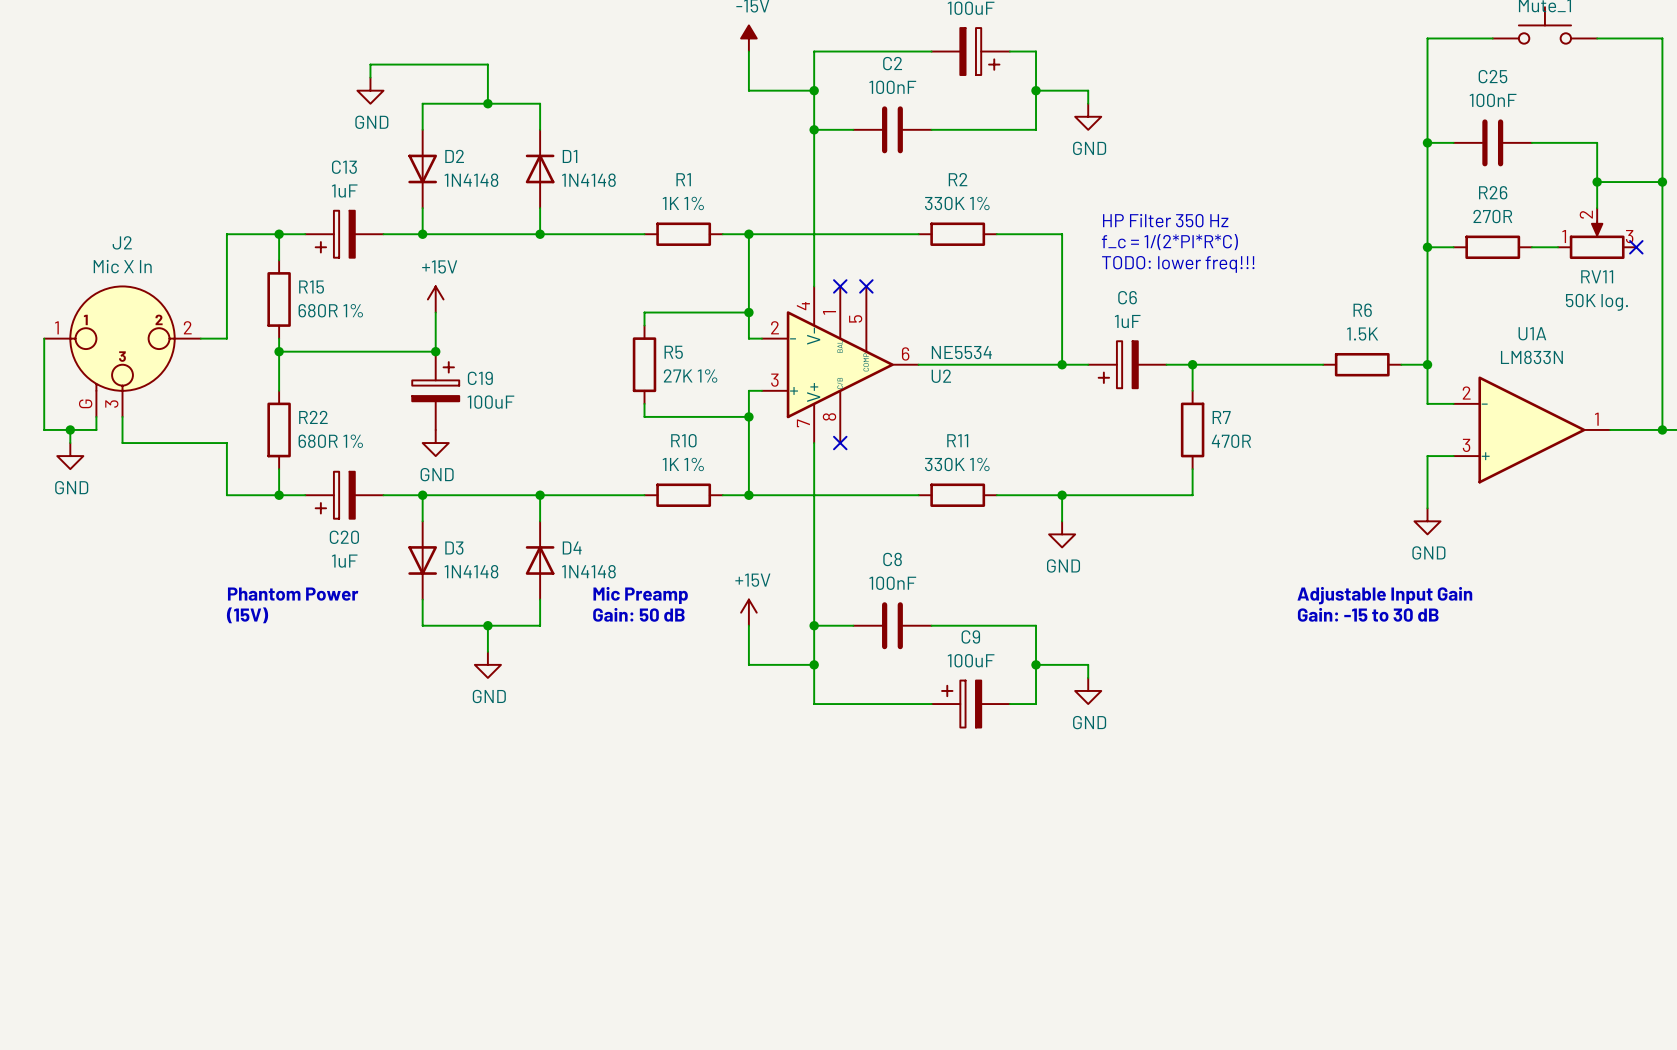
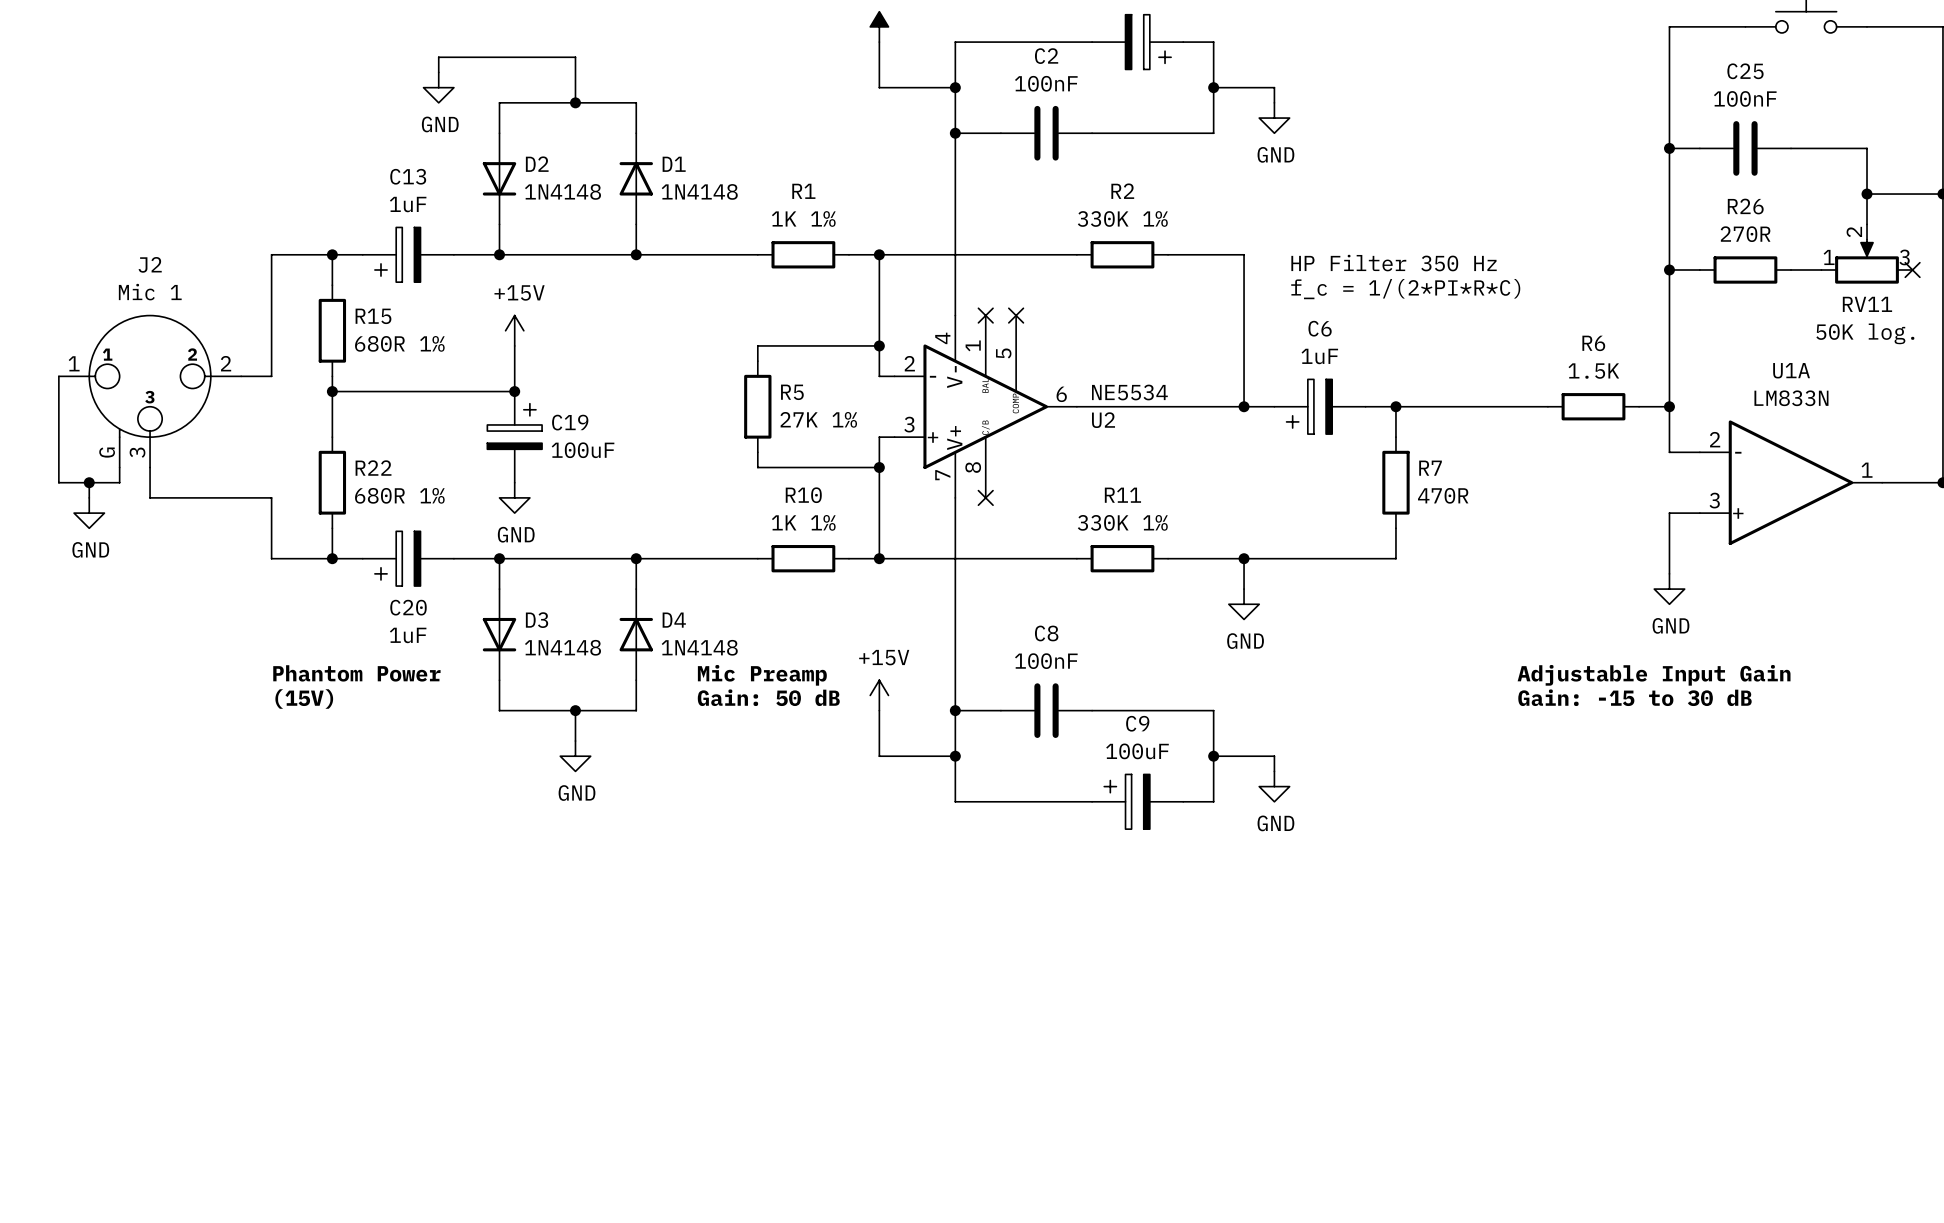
text: HP Filter 350 Hz (1165, 220) -> none
text: f_c = 1/(2*PI*R*C) (1169, 242) -> HP Filter 350 Hz (1394, 263)
text: TODO: lower freq!!! (1178, 264) -> f_c = 1/(2*PI*R*C) (1405, 289)
J2 value: Mic X In (122, 266) -> Mic 1 (150, 292)

